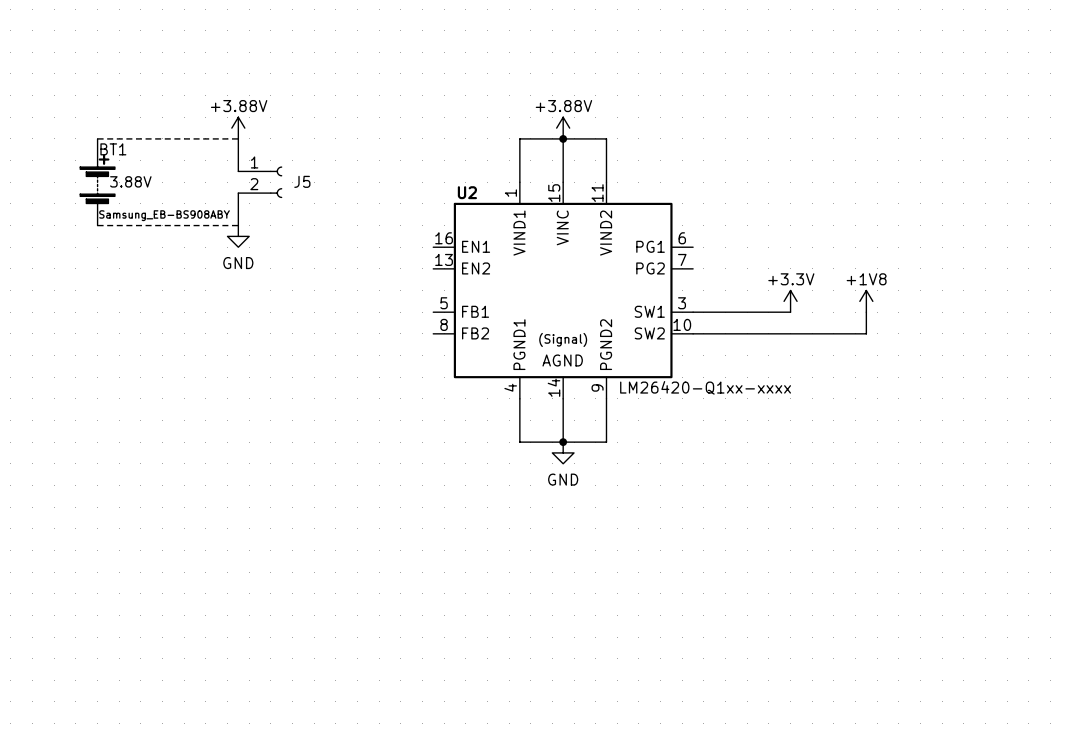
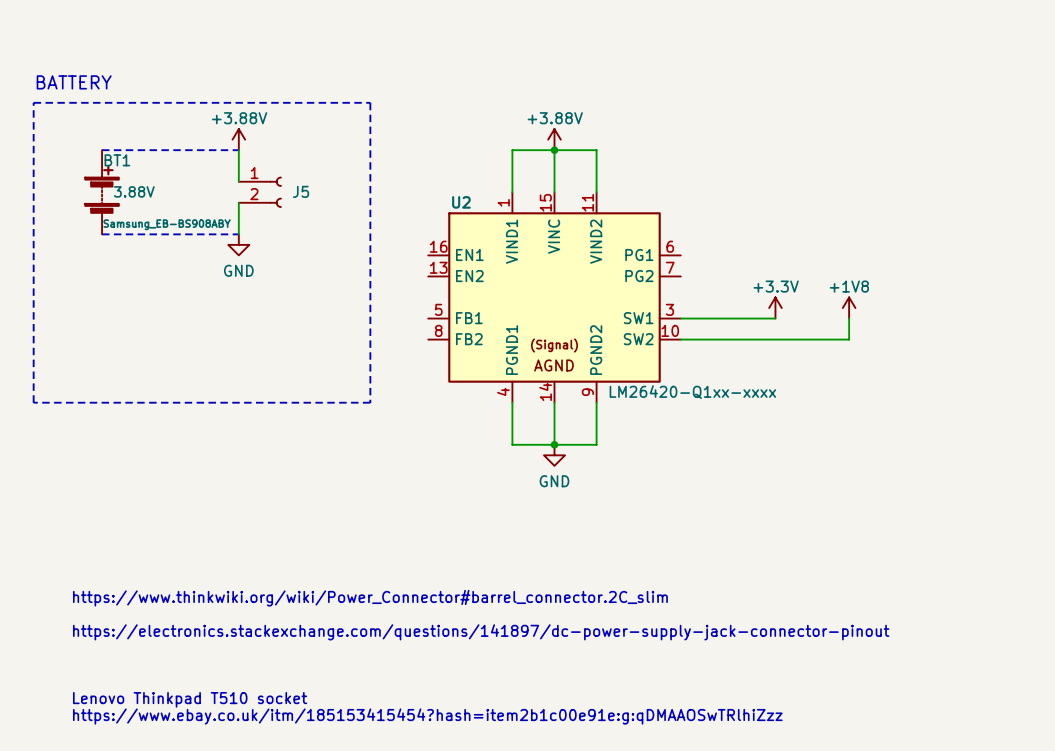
text: none -> BATTERY (74, 82)
line: none -> (33, 102) (370, 102) (370, 402) (33, 402) (33, 102)
text: none -> https://www.thinkwiki.org/wiki/Power_Connector#barrel_connector.2C_slim (370, 598)
text: none -> https://electronics.stackexchange.com/questions/141897/dc-power-supply-jack-connector-pinout (481, 632)
text: none -> Lenovo Thinkpad T510 socket (190, 699)
text: none -> https://www.ebay.co.uk/itm/185153415454?hash=item2b1c00e91e:g:qDMAAOSwTRlhiZzz (427, 716)

